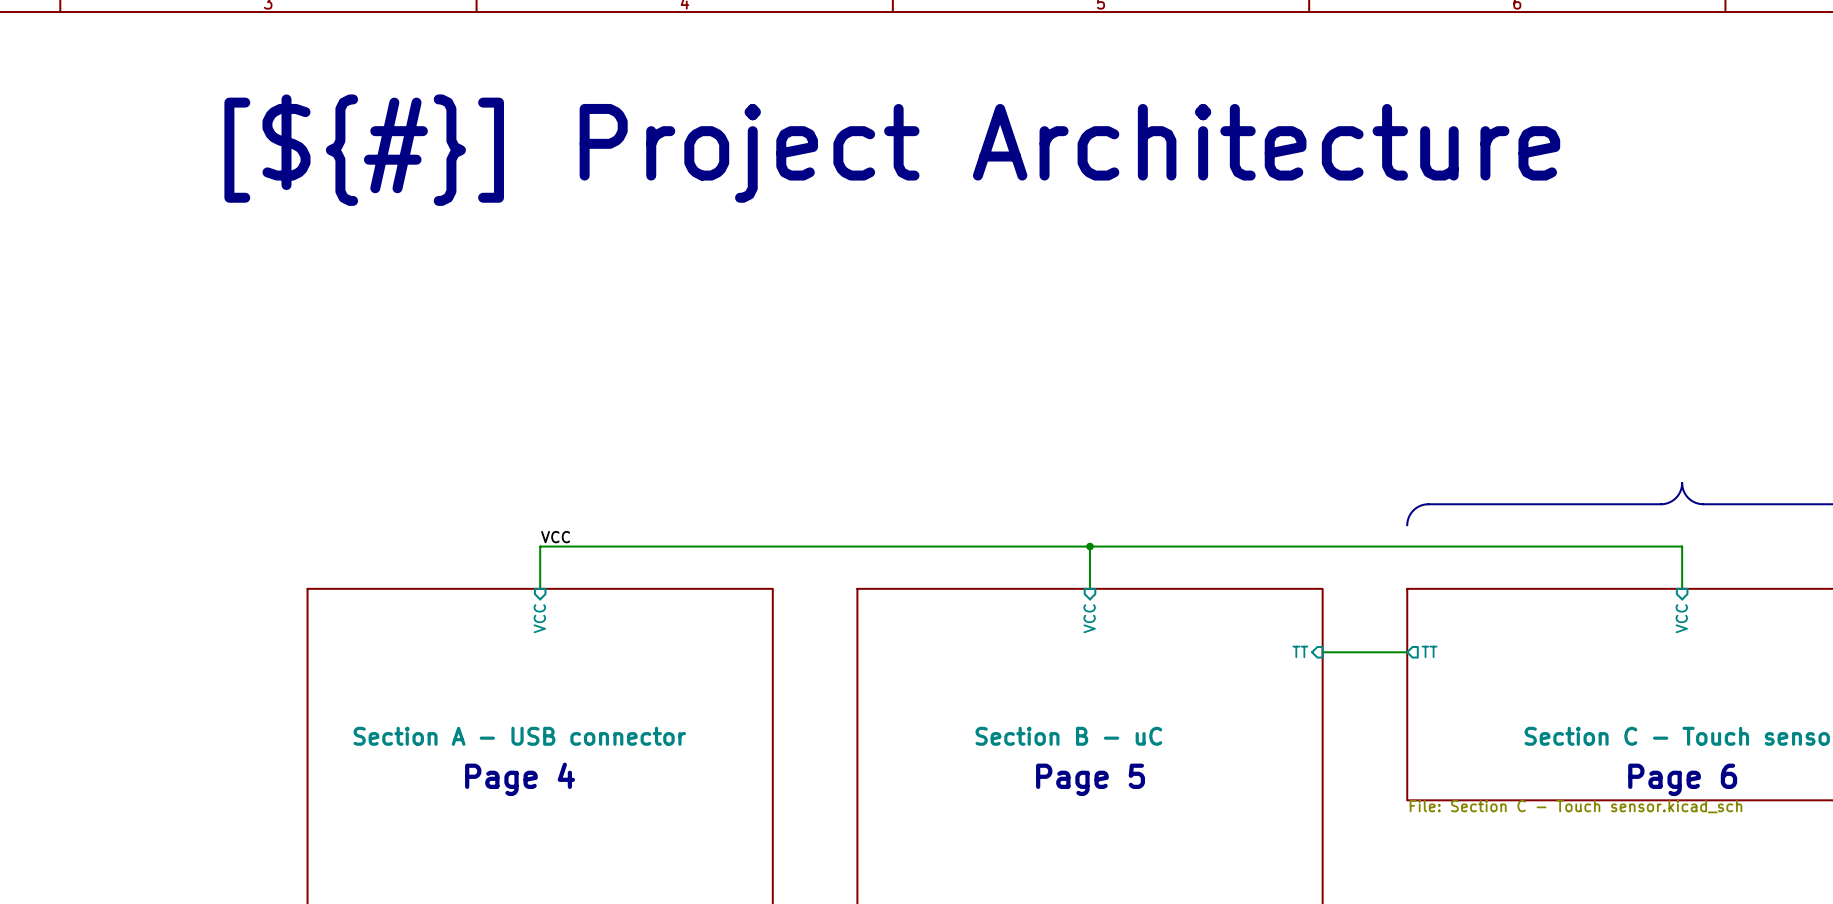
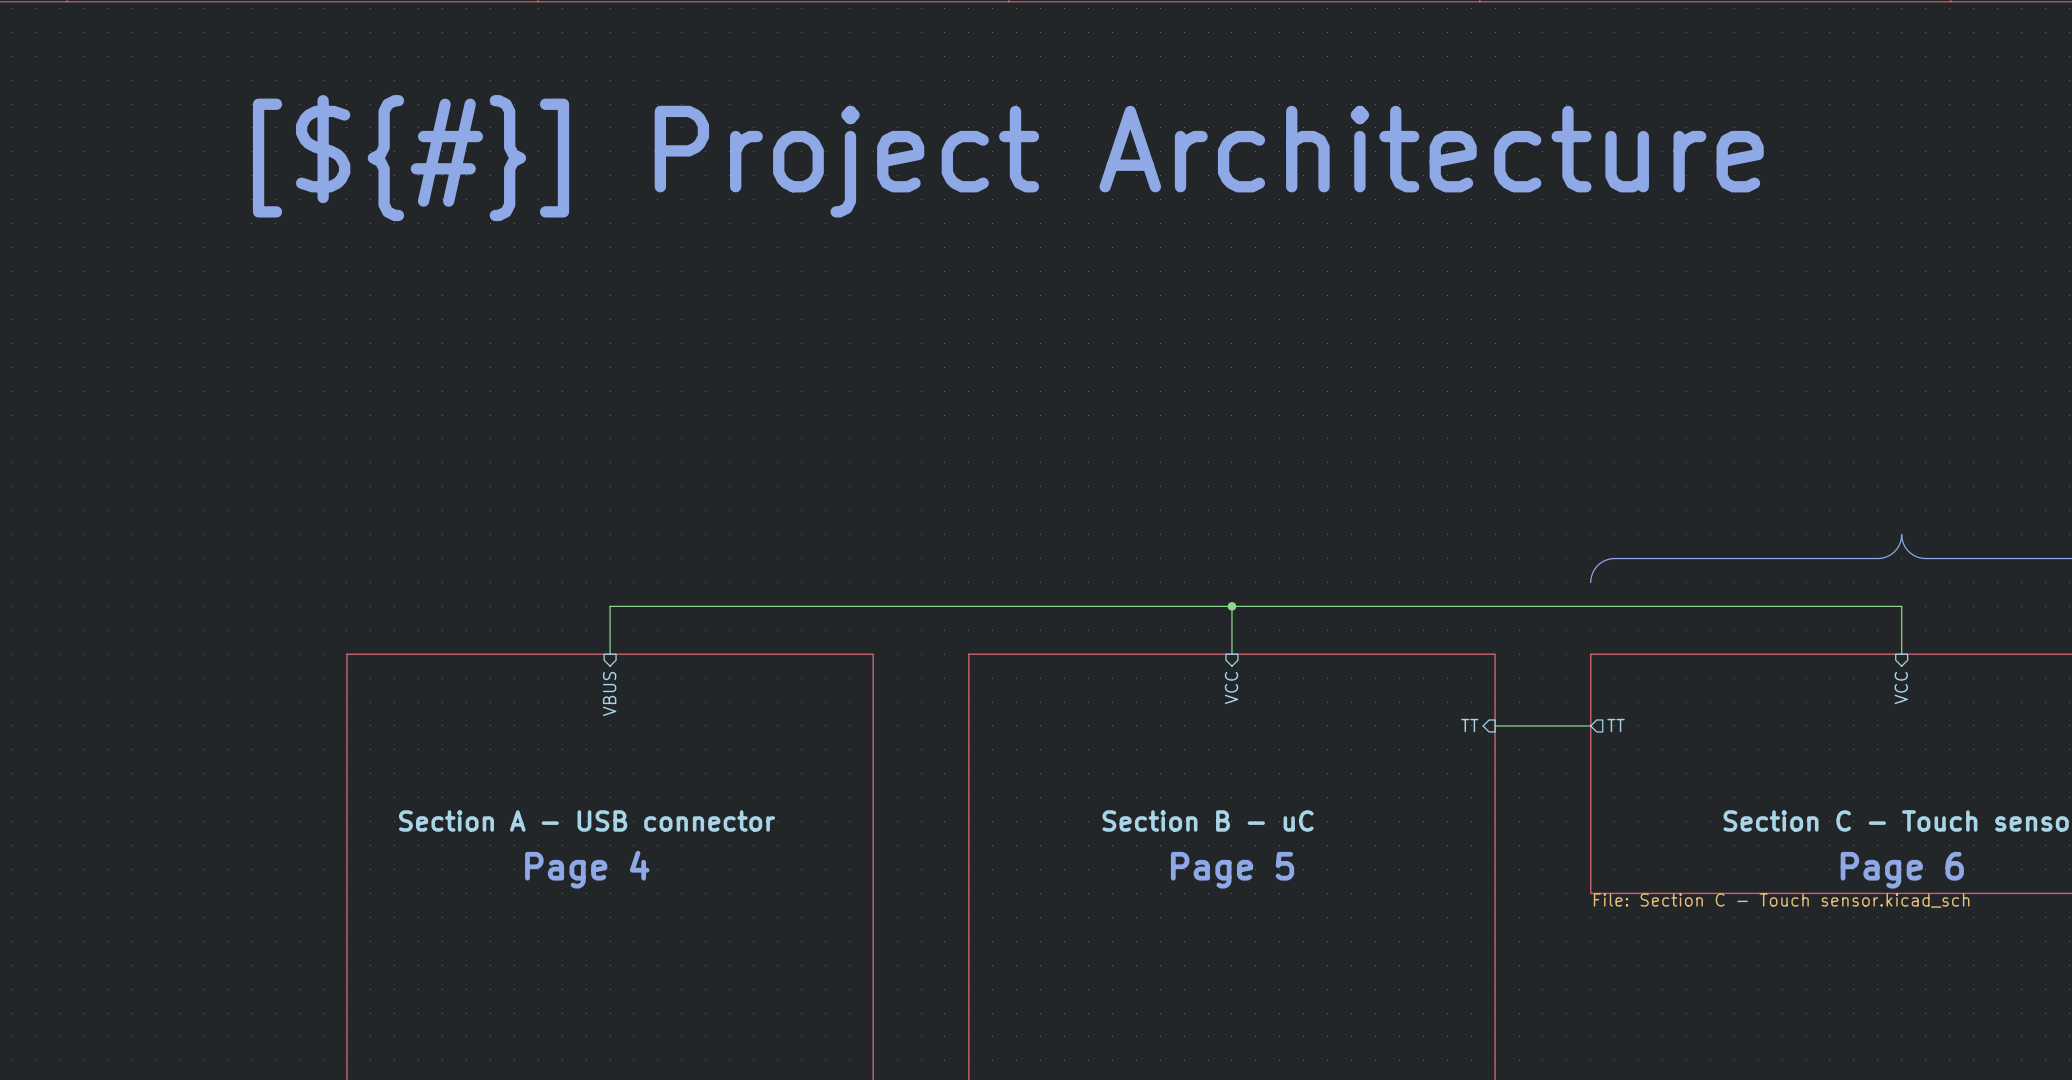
label: VCC (555, 537) -> none
sheet pin: VCC (539, 618) -> VBUS (609, 693)

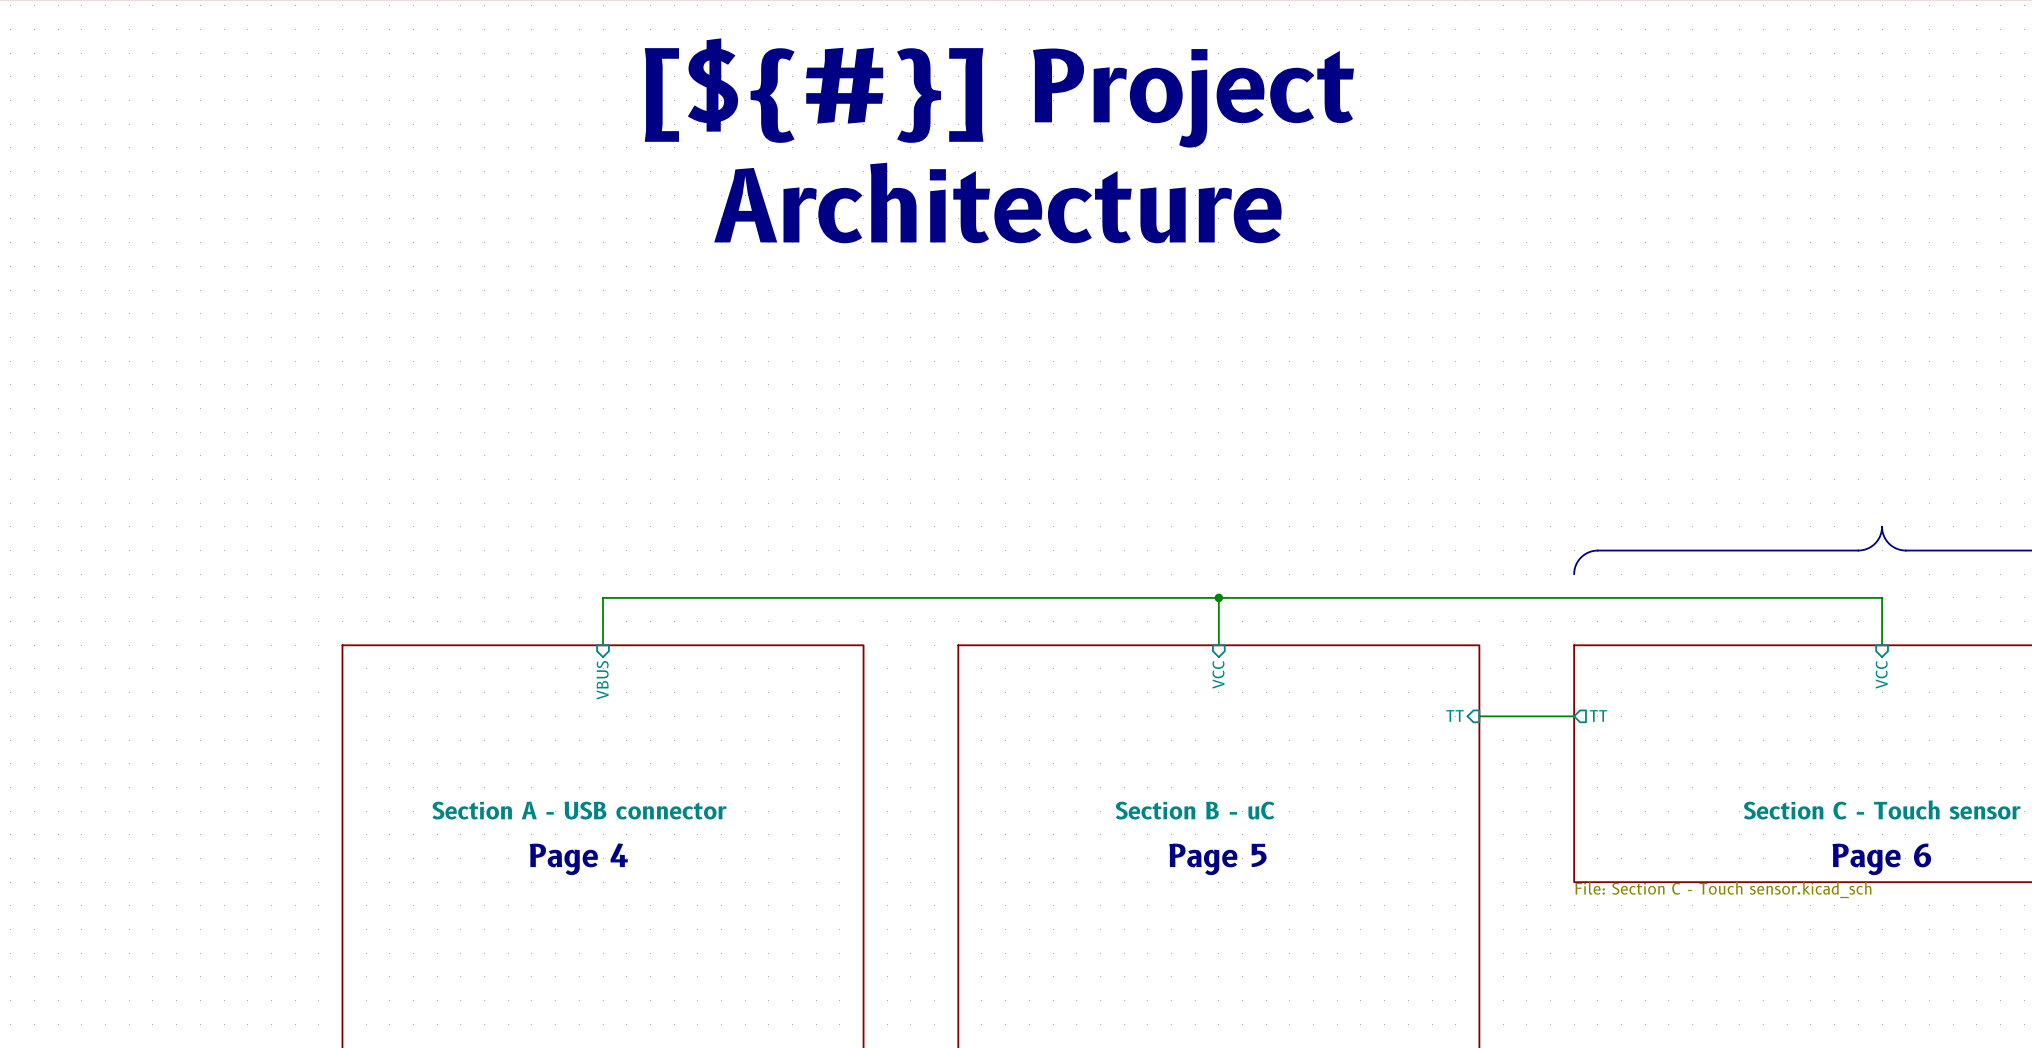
text: none -> [${#}] Project (999, 92)
text: [${#}] Project Architecture (1008, 158) -> none
text: none -> Architecture (997, 203)

